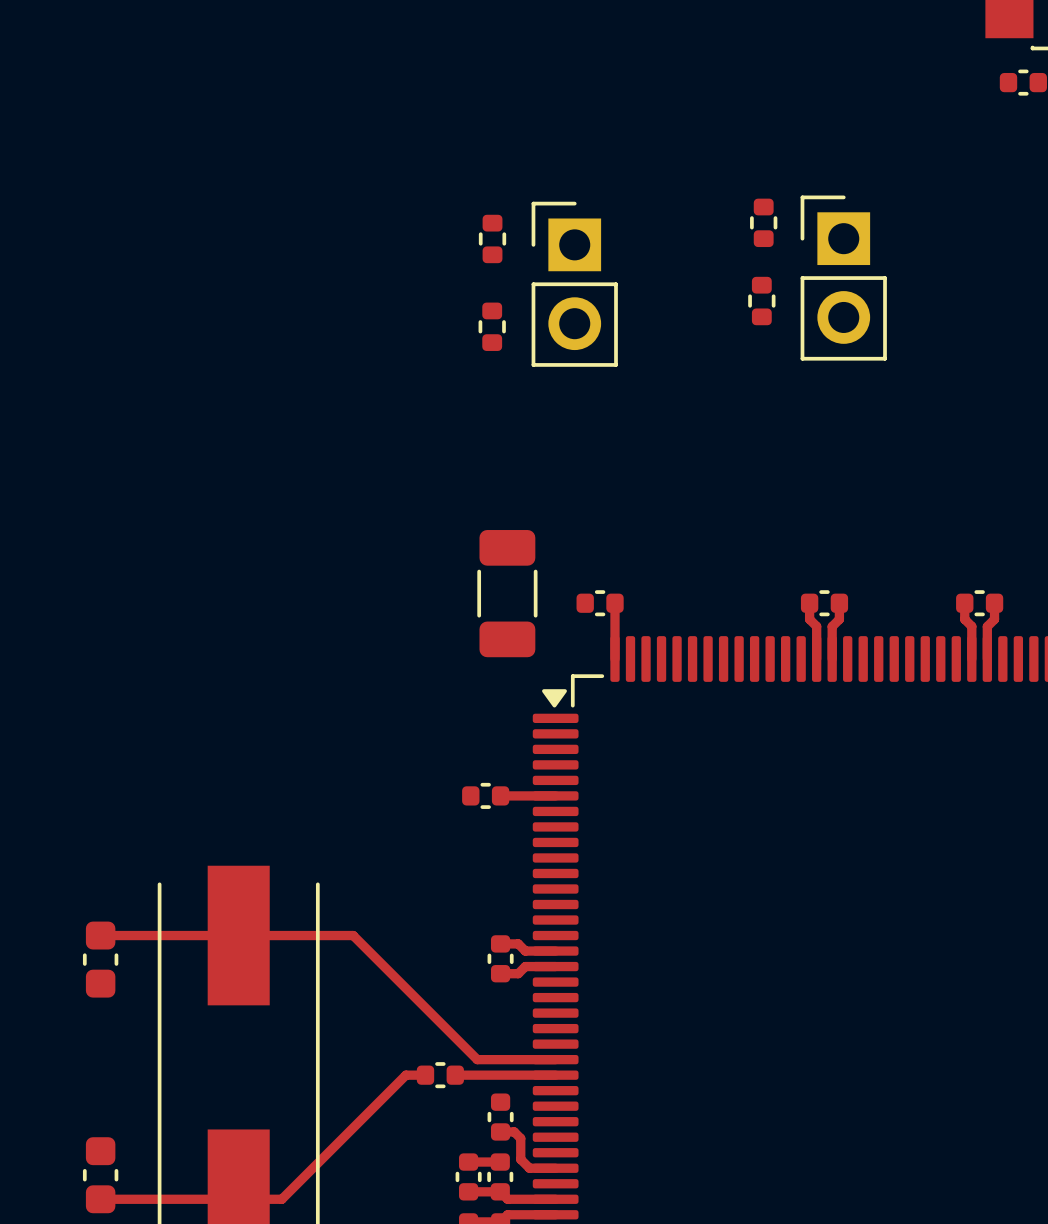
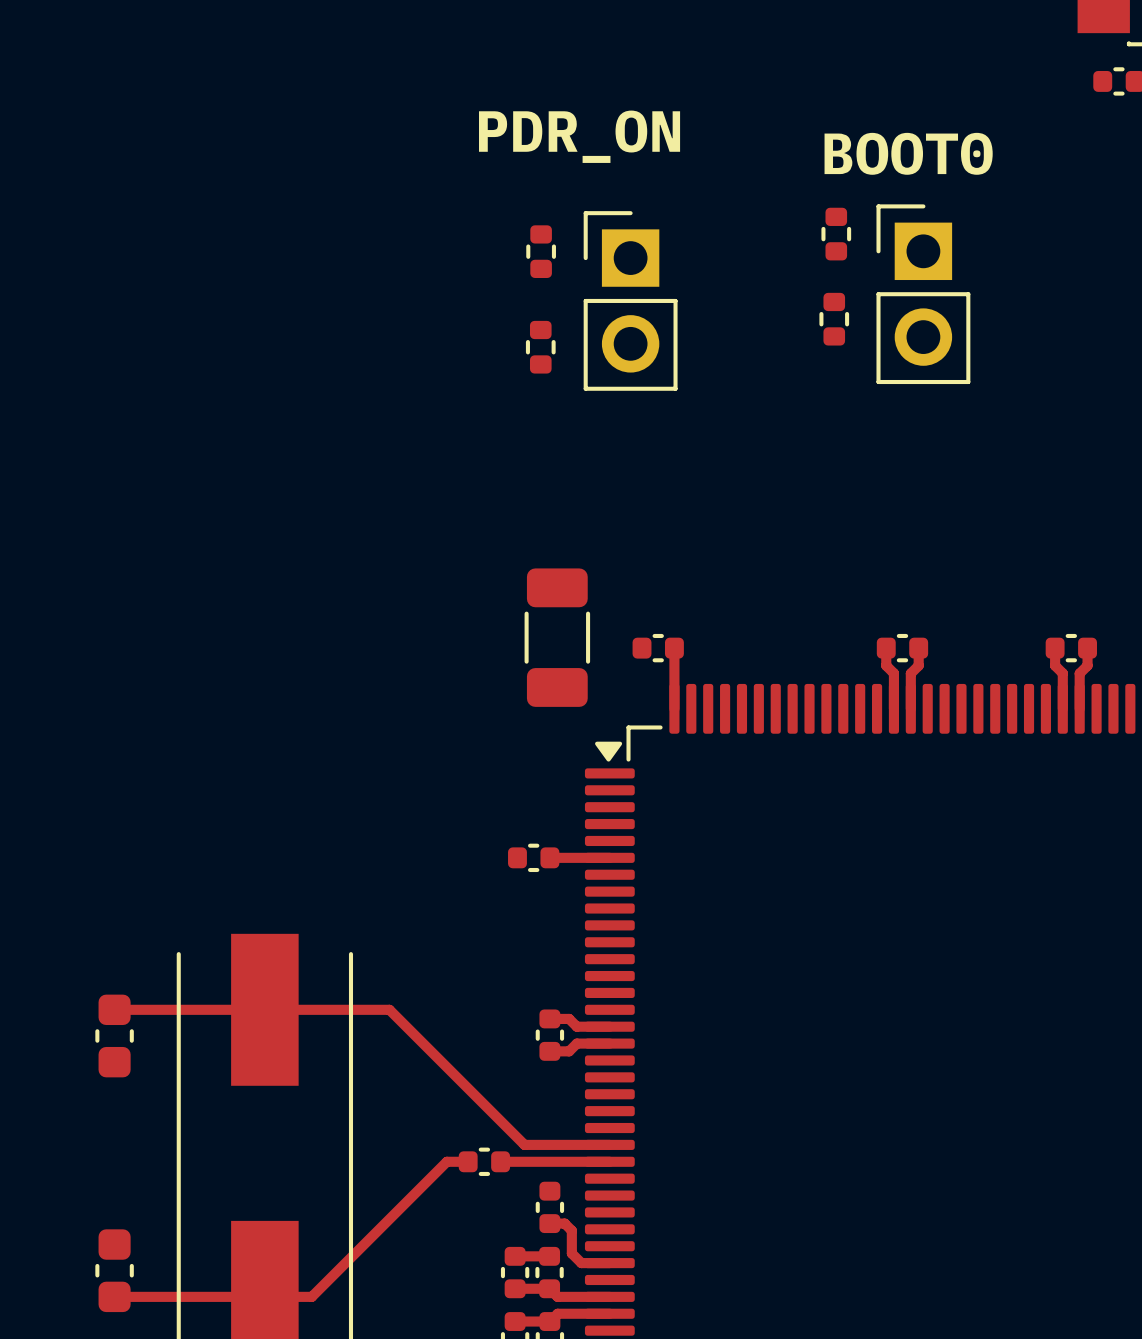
text: none -> PDR_ON (579, 136)
text: none -> BOOT0 (908, 153)

